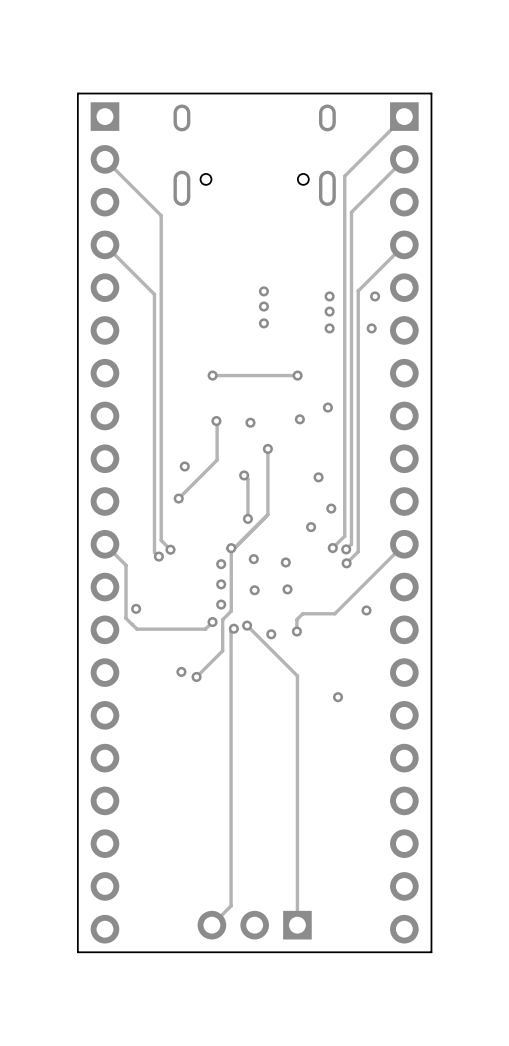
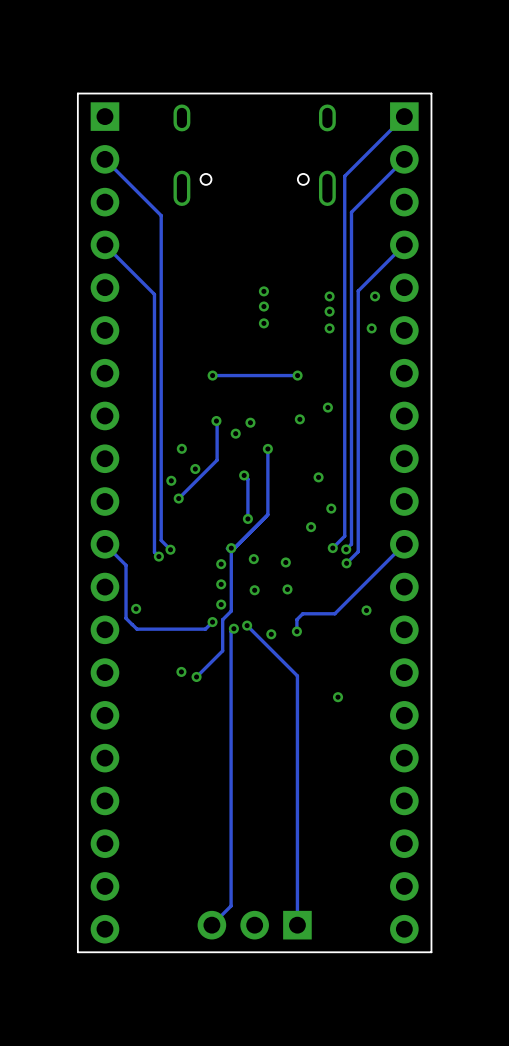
via: none -> (235, 433)
via: none -> (181, 448)
via: (184, 466) -> none
via: none -> (195, 469)
via: none -> (171, 480)

